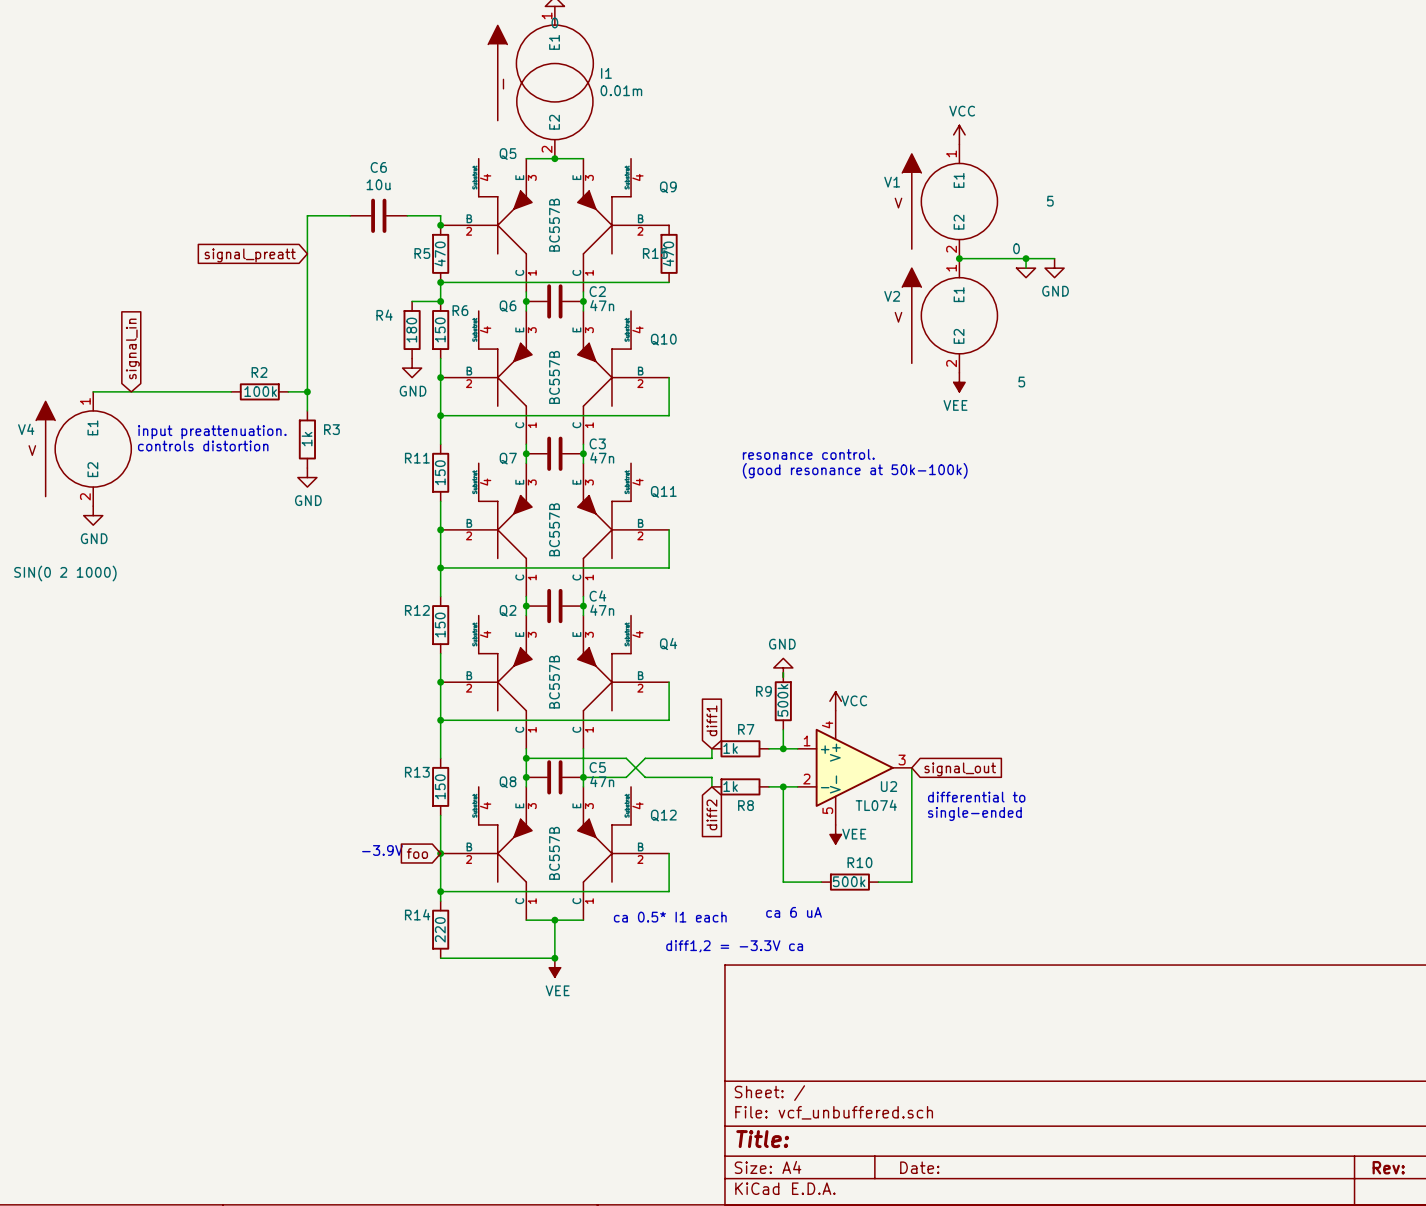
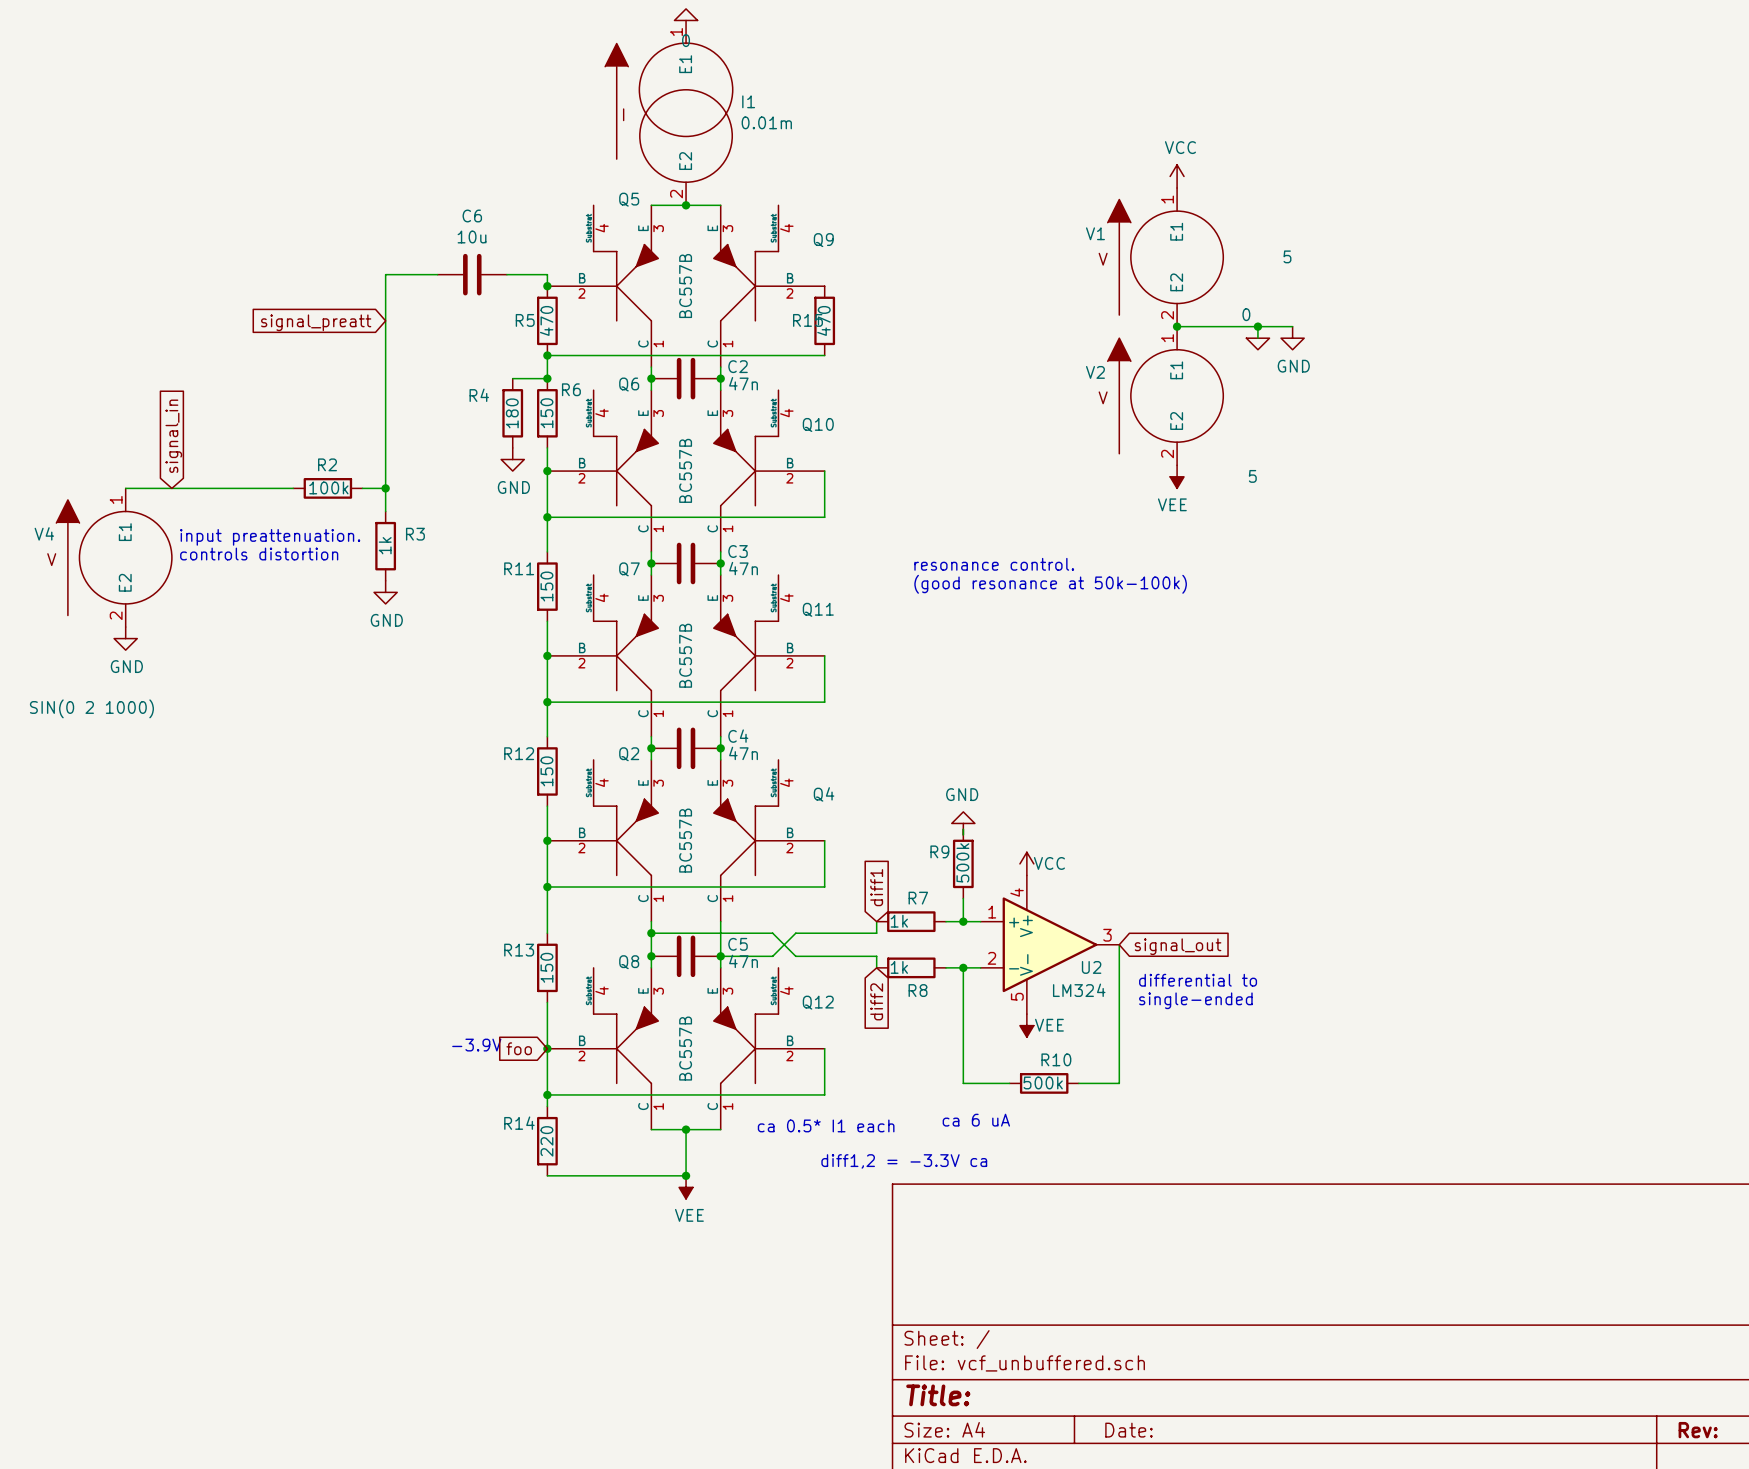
U2 value: TL074 (876, 805) -> LM324 (1079, 990)

